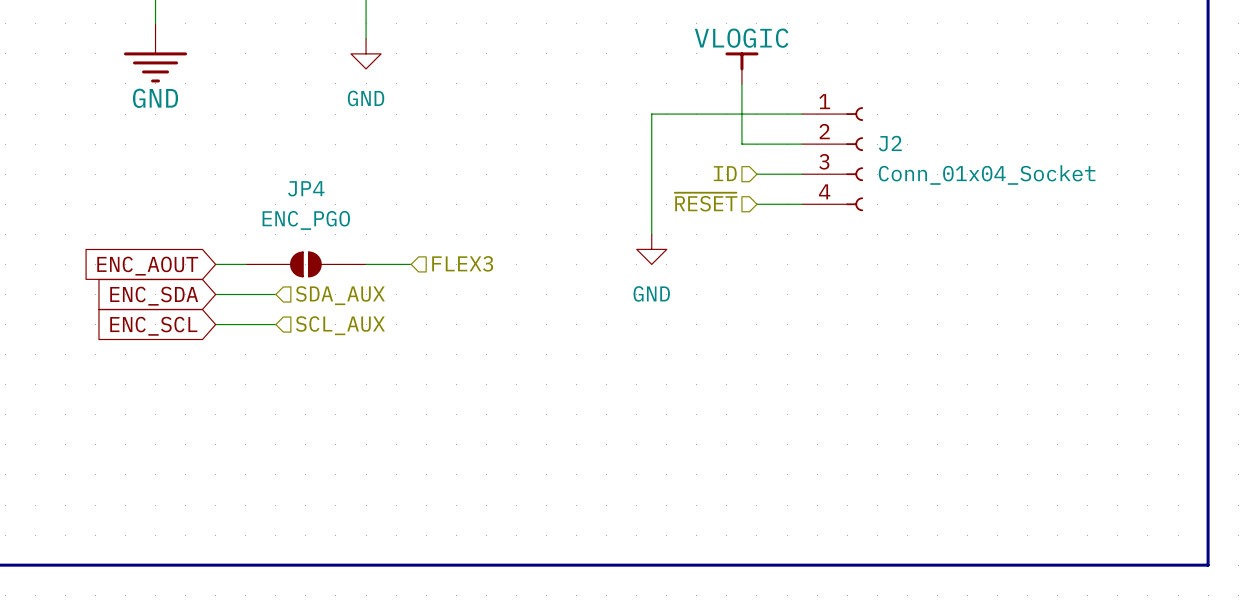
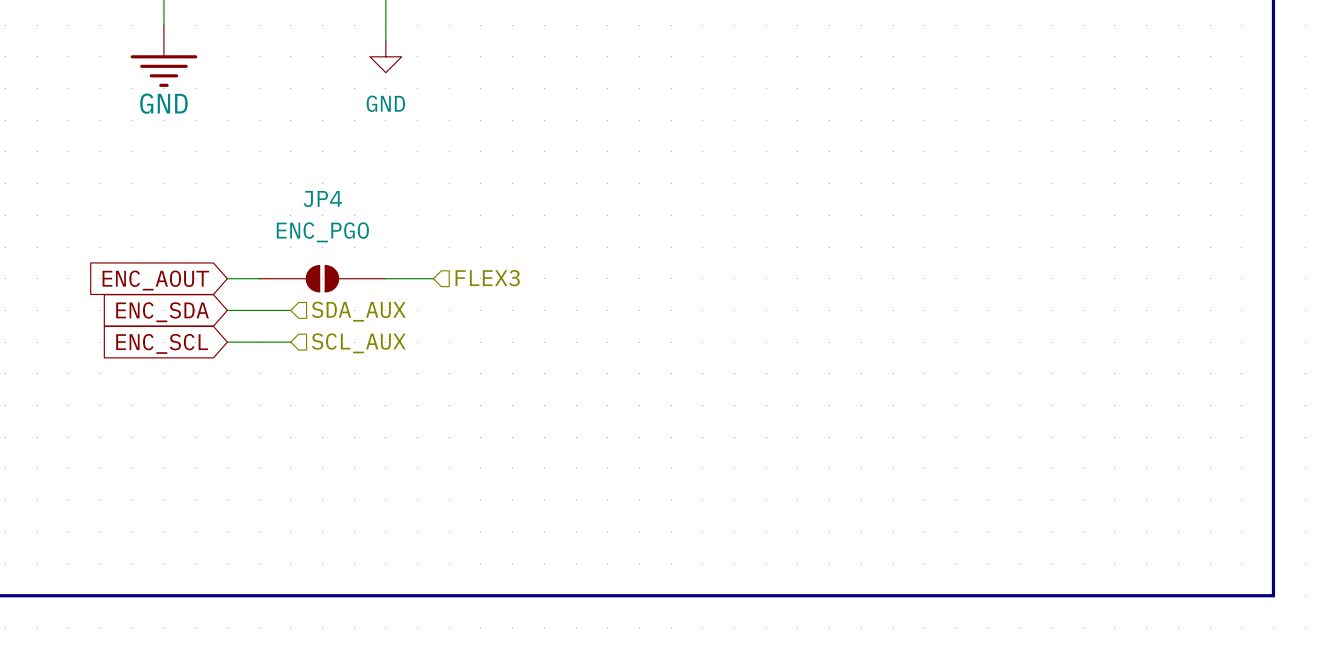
power symbol: VLOGIC (741, 68) -> none
wire: (741, 83) (741, 144) (802, 144) -> none
wire: (802, 114) (651, 114) (651, 234) -> none
J2: Conn_01x04_Socket (832, 159) -> none
hierarchical label: ID (725, 173) -> none
wire: (756, 174) (802, 174) -> none
hierarchical label: ~{RESET} (706, 202) -> none
wire: (756, 204) (802, 204) -> none
power symbol: GND (651, 249) -> none

